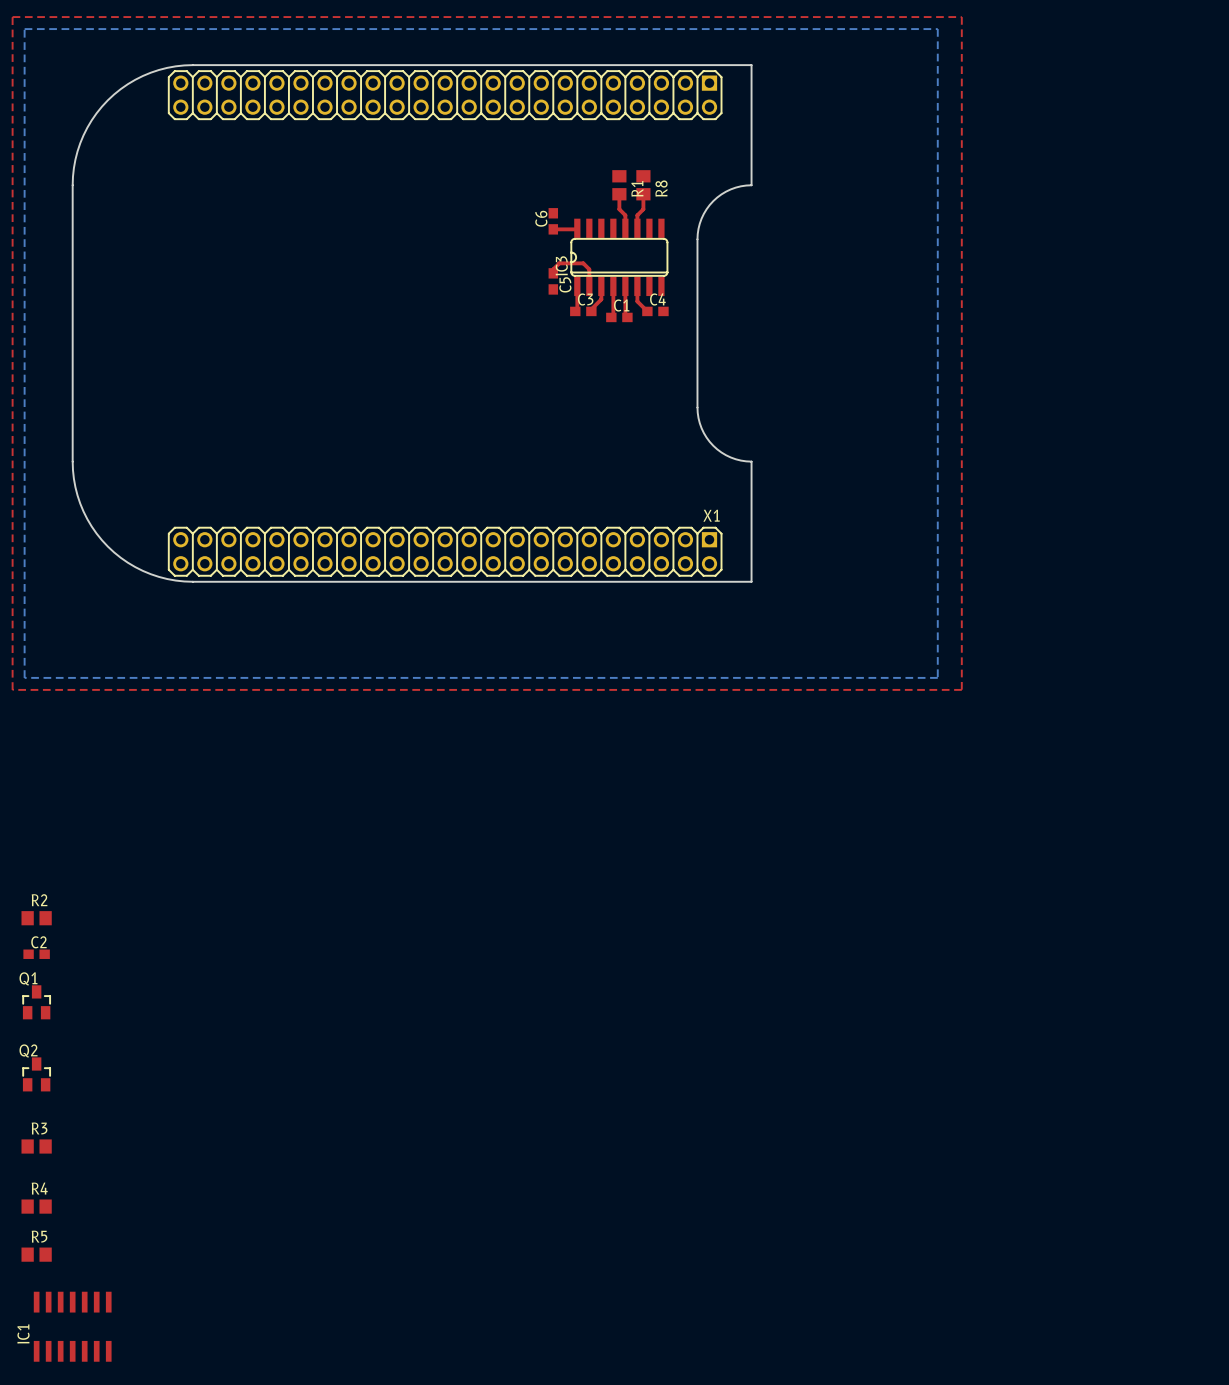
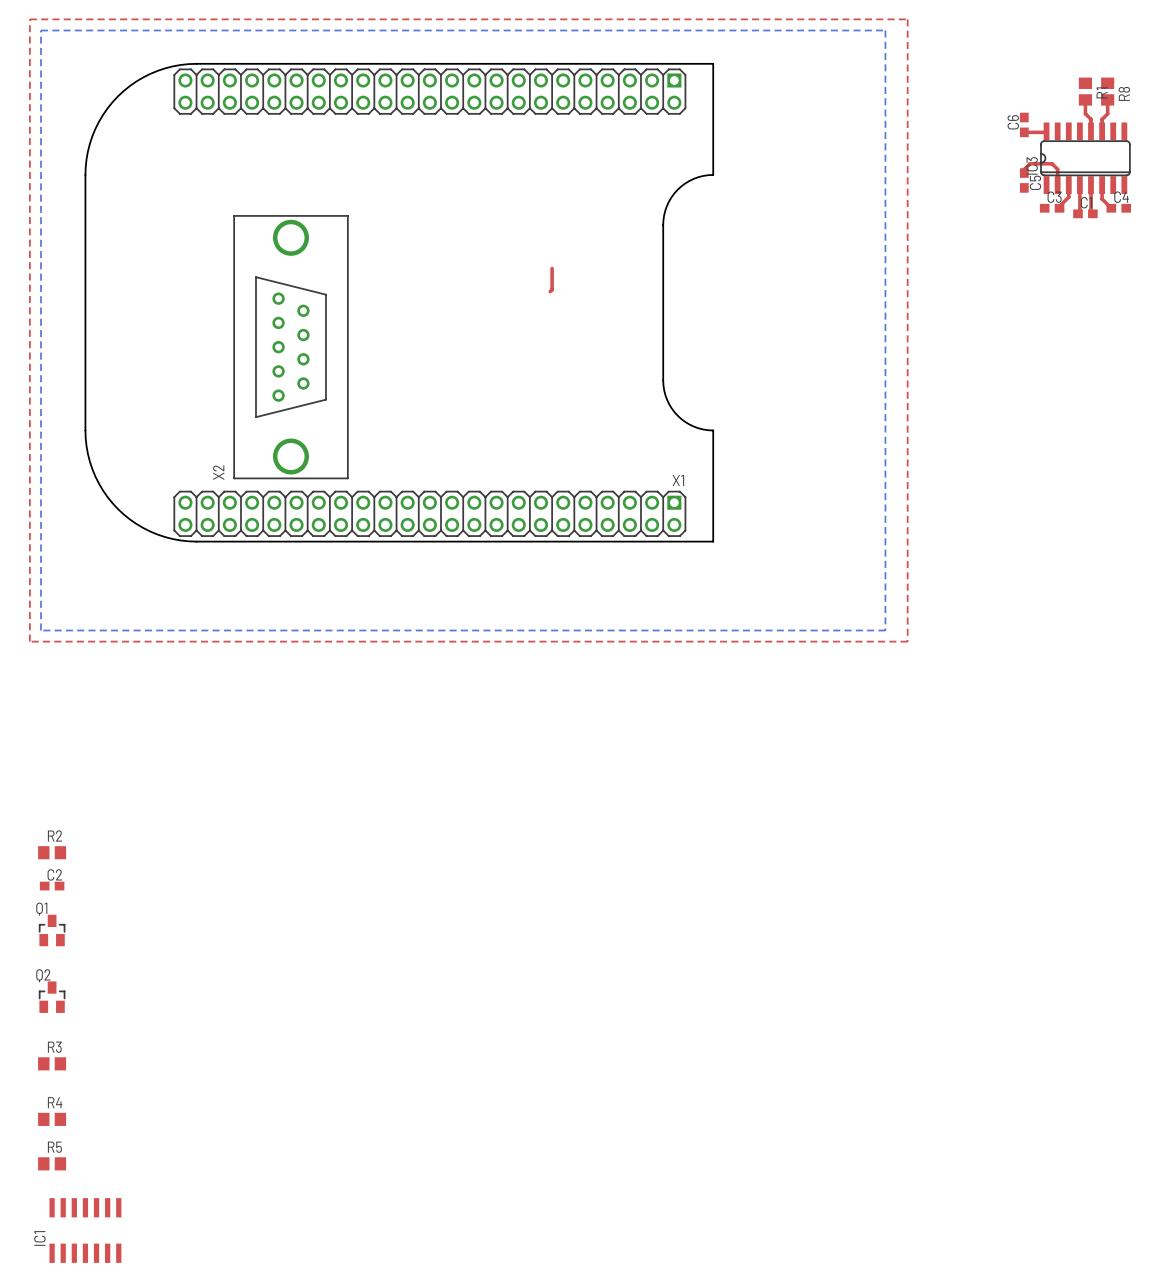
top track: none -> (1085, 99) (1085, 113) (1091, 119) (1091, 131)
top track: none -> (1107, 99) (1107, 113) (1102, 119) (1102, 131)
top track: none -> (1046, 131) (1024, 132)
top track: none -> (1024, 173) (1024, 169) (1029, 163) (1052, 163) (1057, 169) (1057, 185)
R1 position: (619, 185) -> (1085, 91)
R8 position: (643, 185) -> (1107, 91)
top track: (619, 194) (619, 209) (625, 215) (625, 228) -> none
top track: (643, 194) (643, 209) (637, 215) (637, 228) -> none
top track: none -> (1068, 185) (1068, 197) (1059, 208)
top track: none -> (1079, 185) (1079, 211) (1078, 213)
top track: none -> (1091, 185) (1091, 211) (1092, 213)
top track: none -> (1102, 185) (1102, 199) (1111, 208)
C6 position: (553, 221) -> (1024, 124)
top track: (577, 228) (553, 229) -> none
IC3 position: (619, 257) -> (1085, 158)
top track: (553, 273) (553, 269) (559, 263) (583, 263) (589, 269) (589, 286) -> none
C5 position: (553, 281) -> (1024, 180)
top track: (601, 286) (601, 299) (591, 311) -> none
top track: (613, 286) (613, 315) (611, 317) -> none
top track: (625, 286) (625, 315) (627, 317) -> none
top track: (637, 286) (637, 301) (647, 311) -> none
C3 position: (583, 311) -> (1052, 208)
C4 position: (655, 311) -> (1118, 208)
C1 position: (619, 317) -> (1085, 213)
X2: none -> (290, 347)

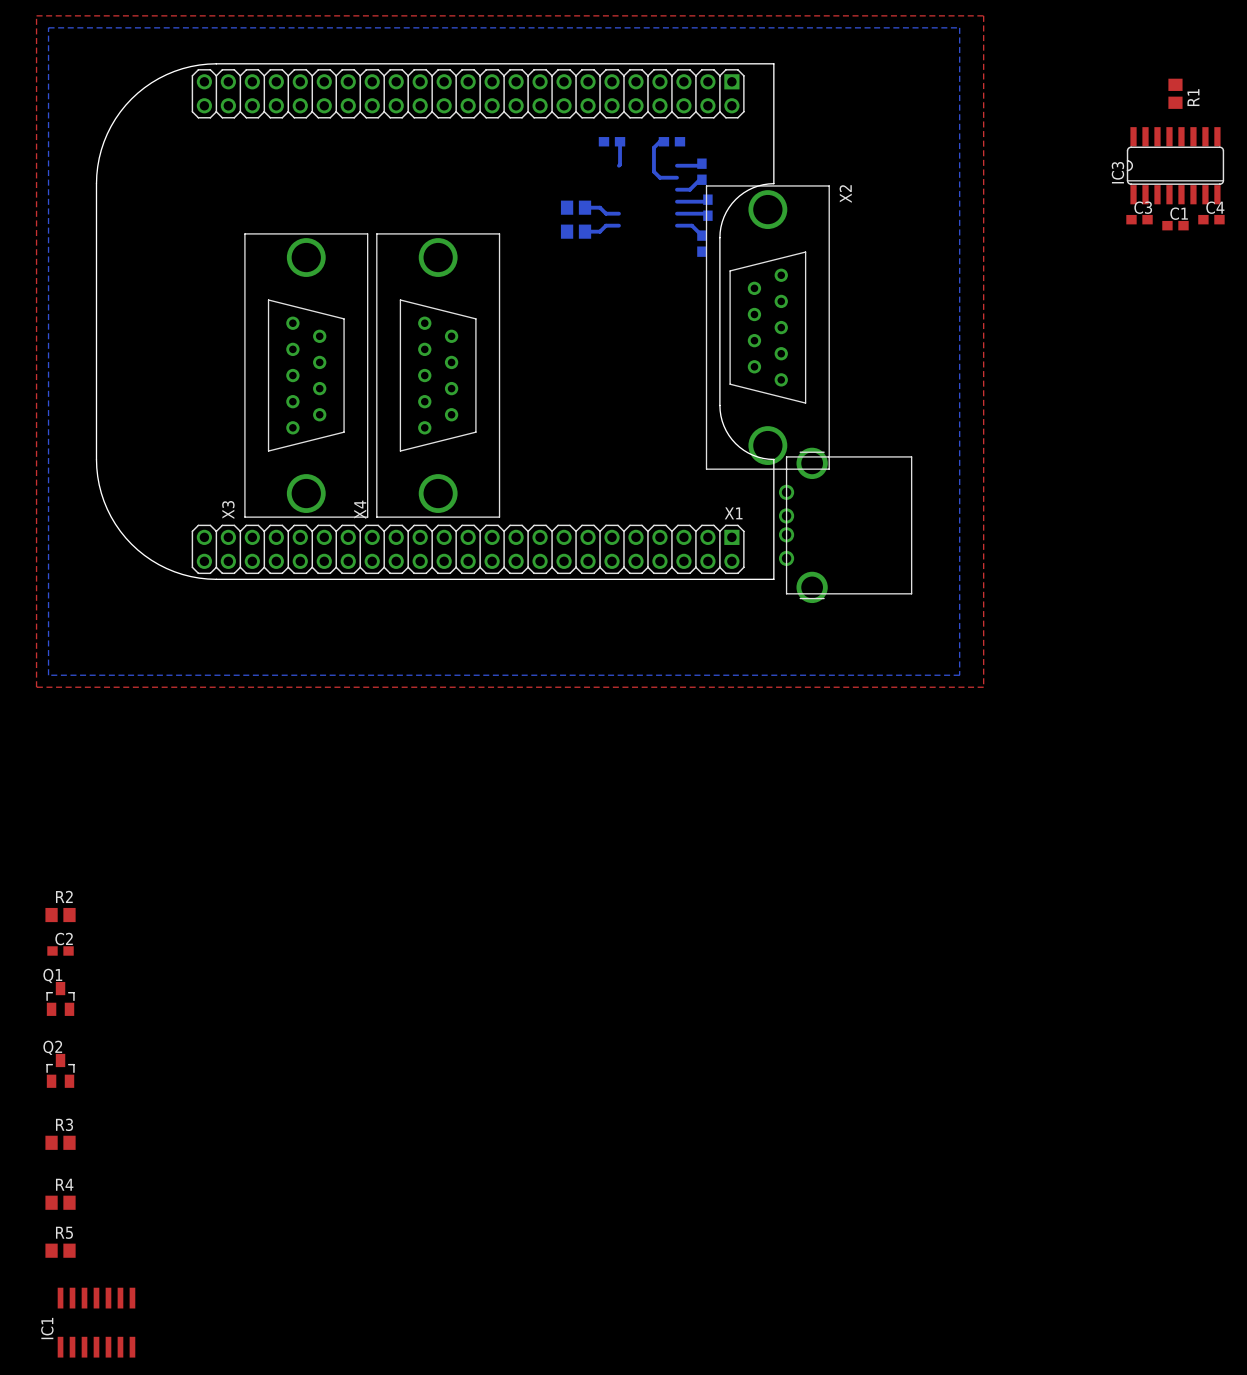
R8: (1107, 91) -> none
top track: (1085, 99) (1085, 113) (1091, 119) (1091, 131) -> none
top track: (1107, 99) (1107, 113) (1102, 119) (1102, 131) -> none
C6: (1024, 124) -> none
top track: (1046, 131) (1024, 132) -> none
part: none -> (612, 141)
bottom track: none -> (620, 141) (618, 165)
bottom track: none -> (663, 141) (659, 141) (653, 147) (653, 171) (659, 177) (676, 177)
part: none -> (671, 141)
bottom track: none -> (701, 163) (699, 165) (676, 165)
part: none -> (701, 171)
bottom track: none -> (701, 179) (689, 189) (676, 189)
top track: (1024, 173) (1024, 169) (1029, 163) (1052, 163) (1057, 169) (1057, 185) -> none
C5: (1024, 180) -> none
top track: (1068, 185) (1068, 197) (1059, 208) -> none
top track: (1079, 185) (1079, 211) (1078, 213) -> none
top track: (1091, 185) (1091, 211) (1092, 213) -> none
top track: (1102, 185) (1102, 199) (1111, 208) -> none
bottom track: none -> (707, 199) (705, 201) (676, 201)
part: none -> (576, 207)
bottom track: none -> (585, 207) (600, 207) (606, 213) (618, 213)
part: none -> (707, 207)
bottom track: none -> (676, 213) (705, 213) (707, 215)
bottom track: none -> (618, 225) (606, 225) (600, 231) (585, 231)
bottom track: none -> (676, 225) (691, 225) (701, 235)
part: none -> (576, 231)
part: none -> (701, 243)
top track: (552, 268) (552, 289) (550, 291) -> none
X2 rotation: 0° (290, 347) -> 180° (767, 327)
X2 position: (290, 347) -> (767, 327)
X3: none -> (306, 375)
X4: none -> (438, 375)
part: none -> (845, 525)

